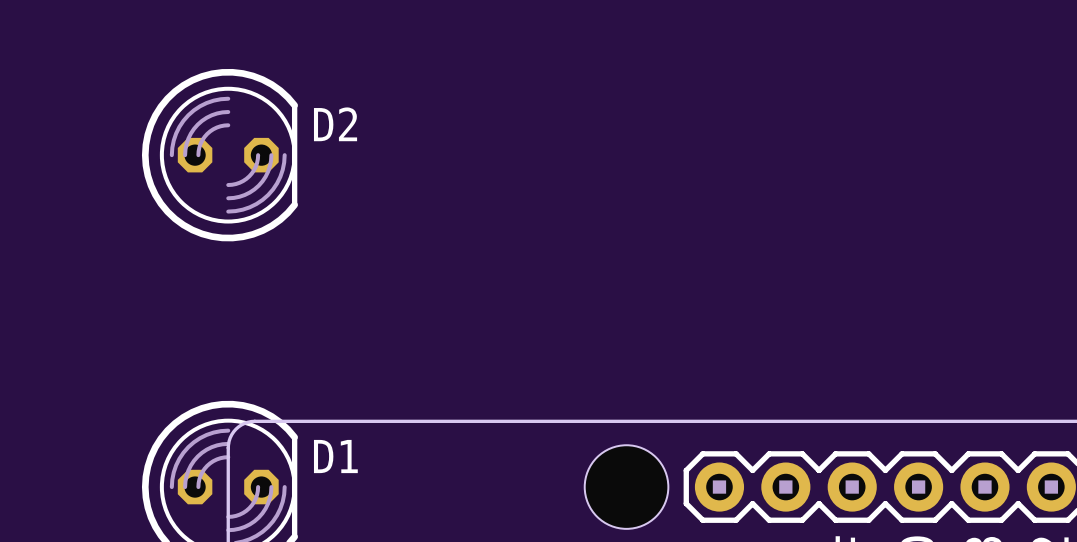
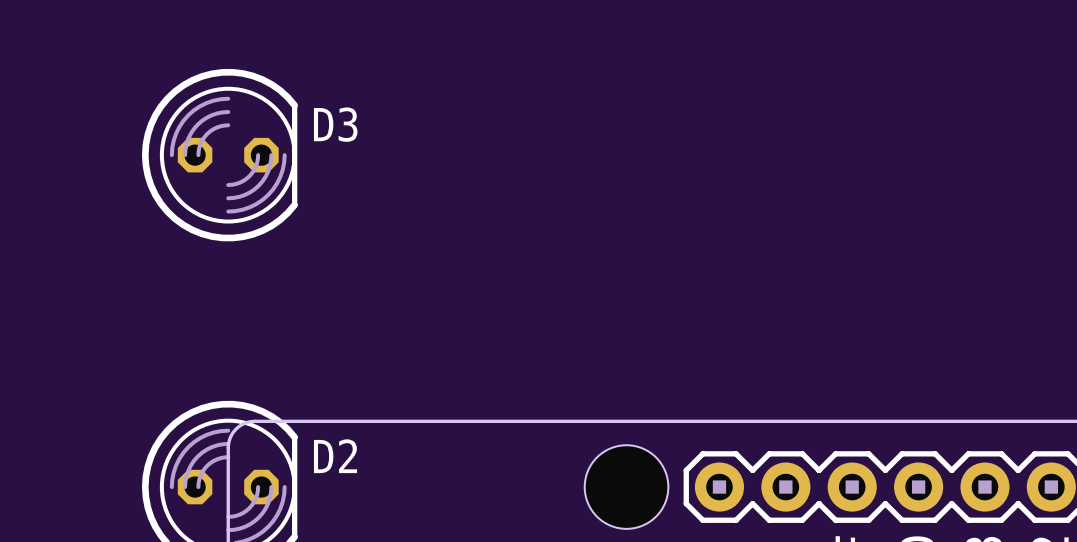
D2 name: D2 (335, 124) -> D3 (335, 124)
D1 name: D1 (335, 456) -> D2 (335, 456)

